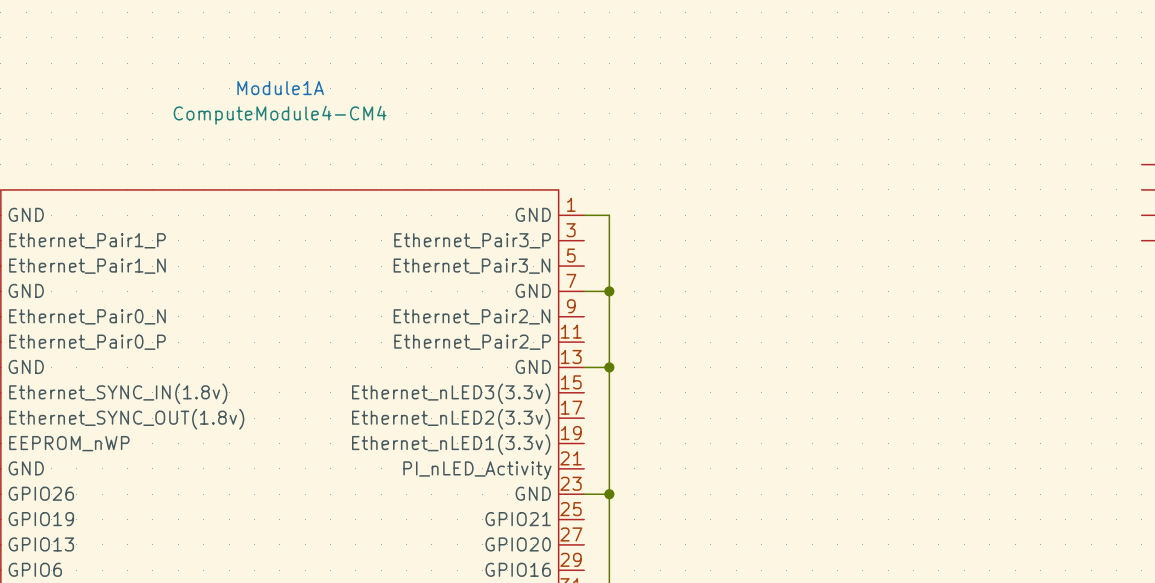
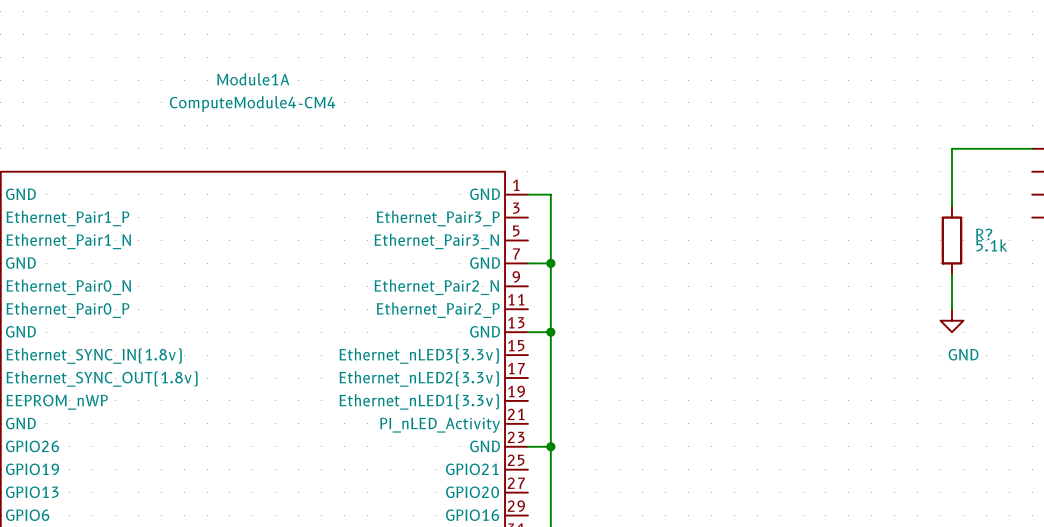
wire: none -> (1032, 148) (951, 148) (951, 206)
R?: none -> 5.1k (951, 240)
wire: none -> (951, 274) (951, 309)
power symbol: none -> GND (951, 320)

